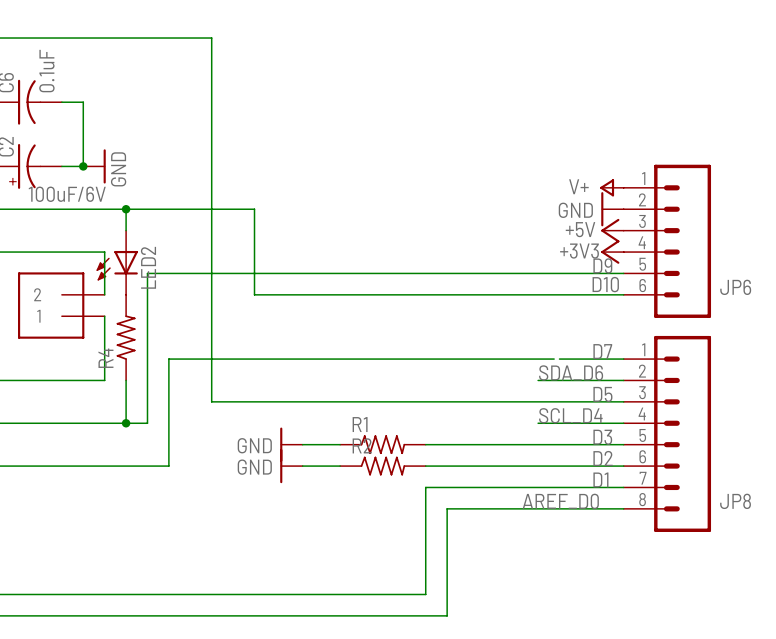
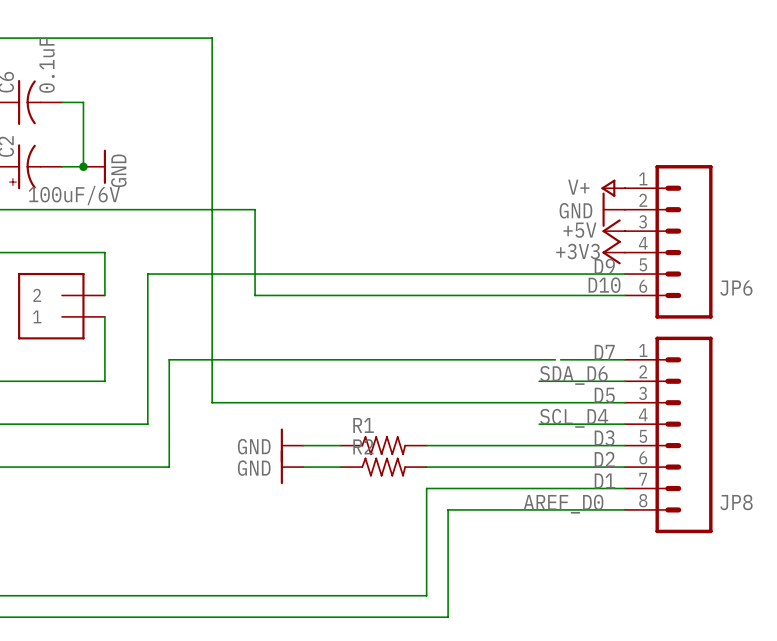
wire: (126, 209) (126, 230) -> none
junction: (126, 209) -> none
LED2: (117, 262) -> none
R4: (126, 337) -> none
wire: (126, 380) (126, 423) -> none
junction: (126, 423) -> none

